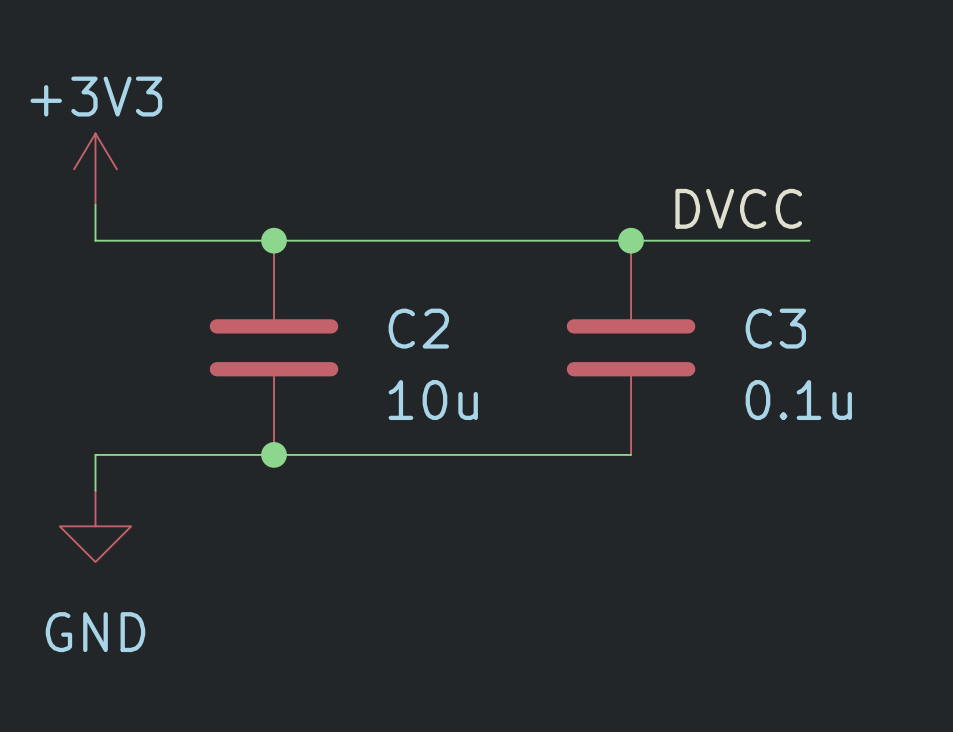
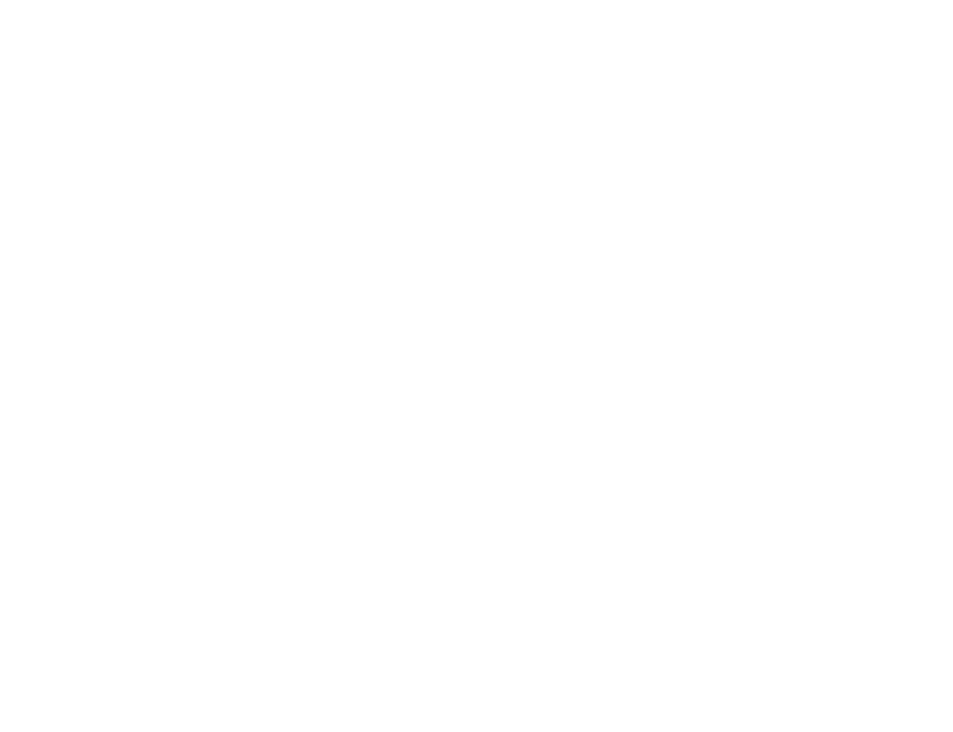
power symbol: +3V3 (95, 169) -> none
wire: (95, 204) (95, 240) (809, 240) -> none
label: DVCC (738, 208) -> none
junction: (274, 240) -> none
junction: (631, 240) -> none
C2: 10u (274, 347) -> none
C3: 0.1u (631, 347) -> none
junction: (274, 454) -> none
wire: (631, 454) (95, 454) (95, 490) -> none
power symbol: GND (95, 526) -> none

